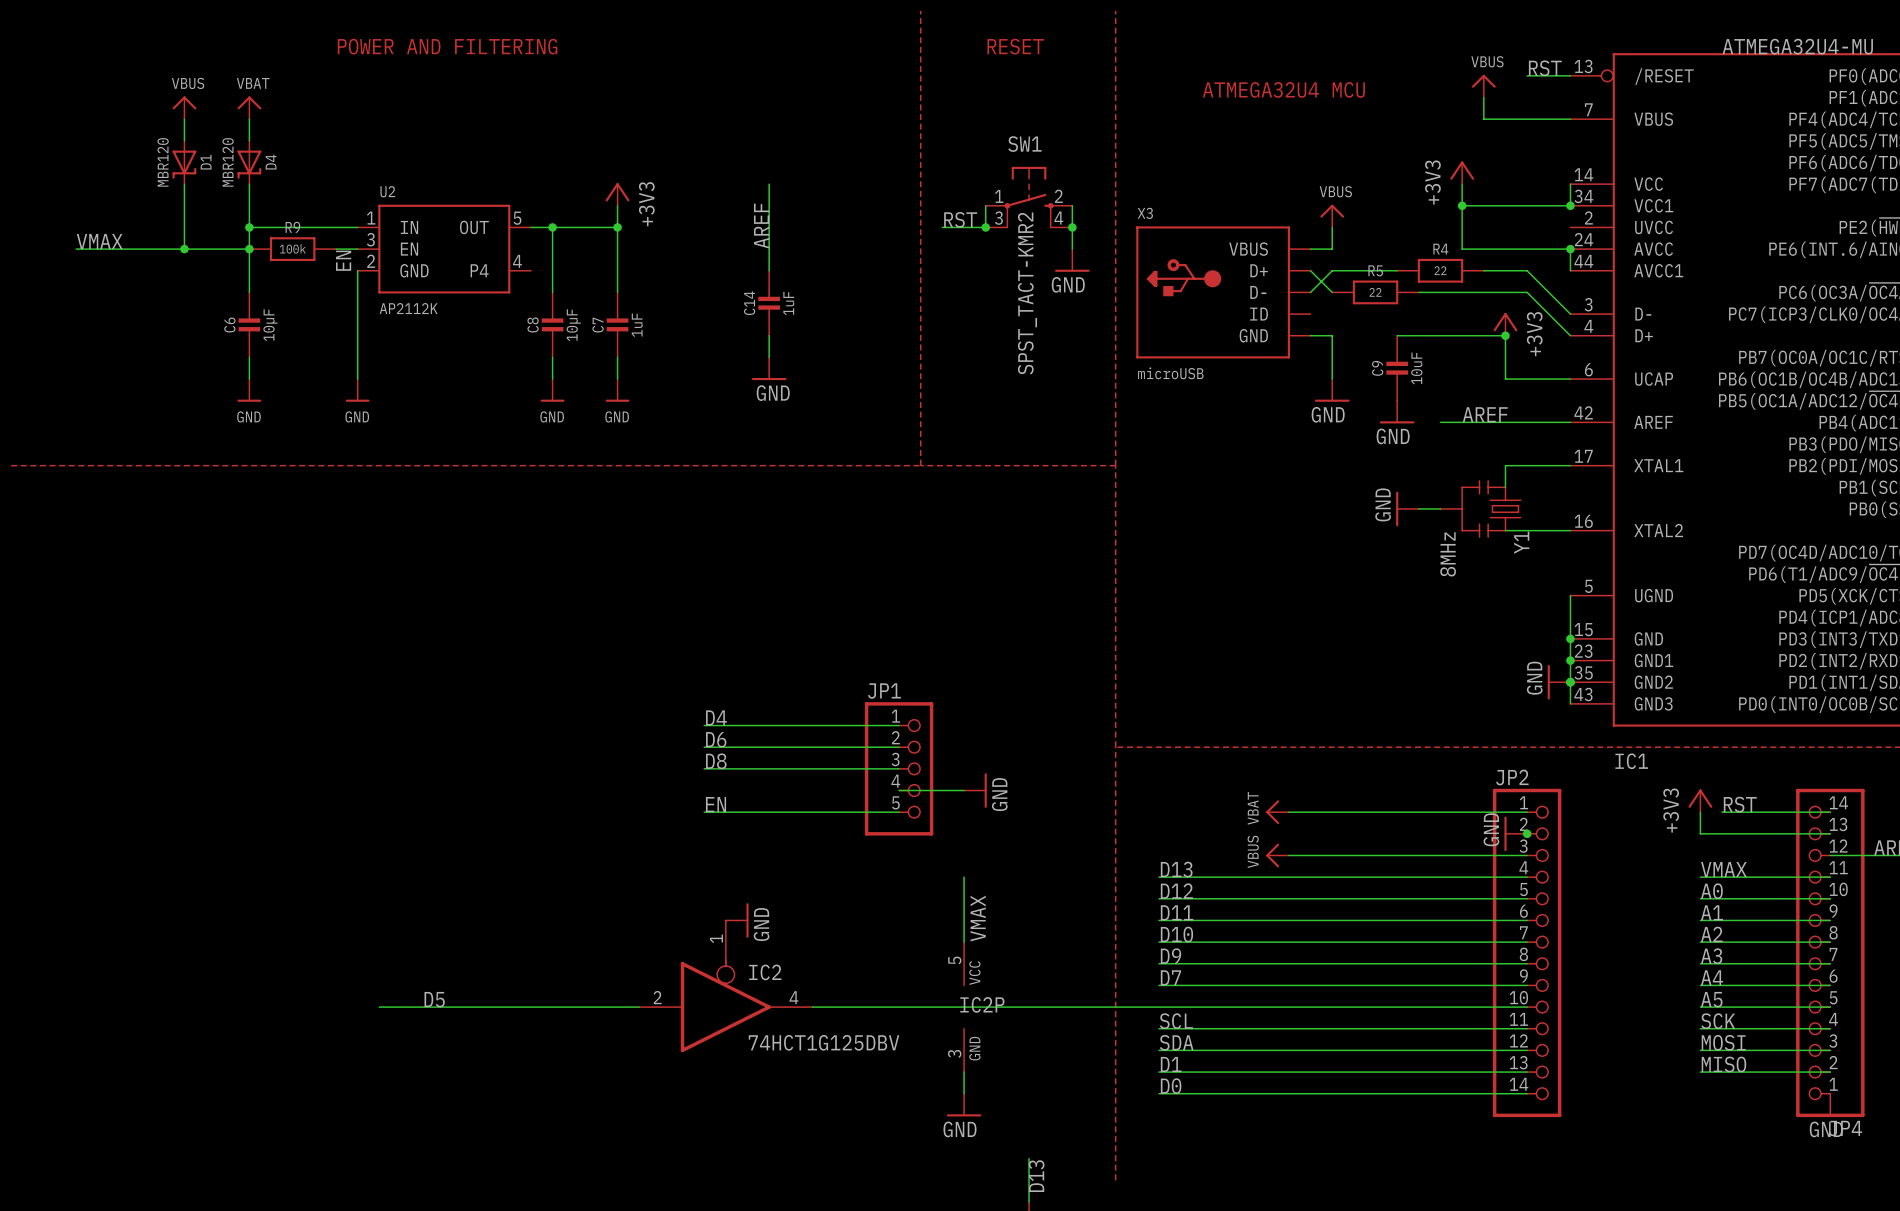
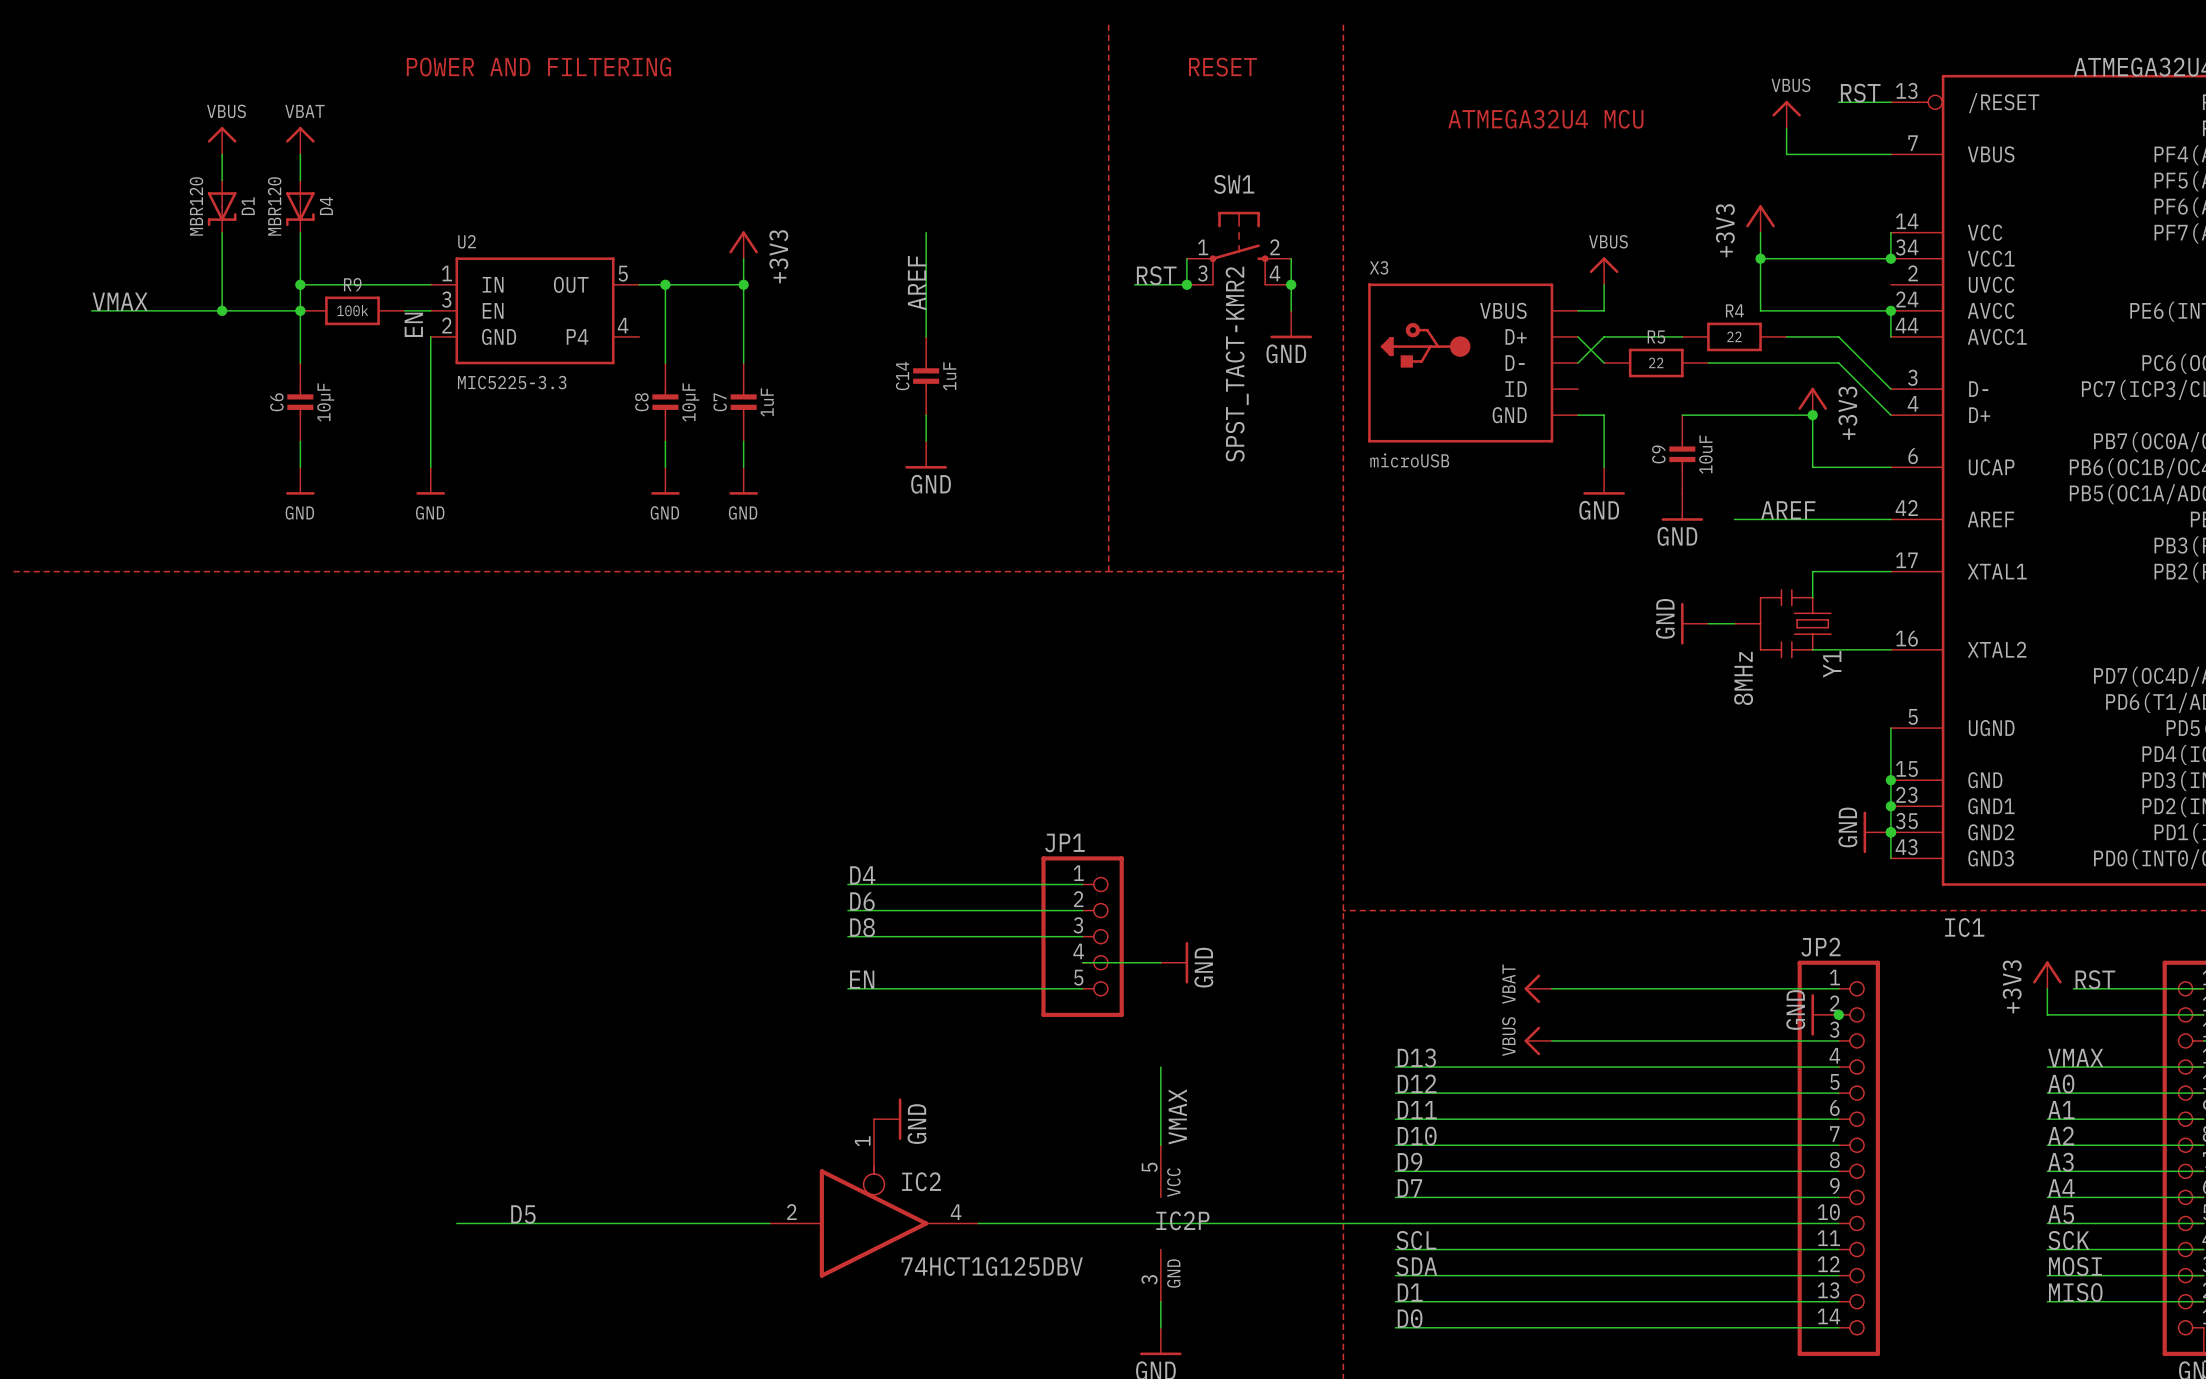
U2 value: AP2112K (408, 308) -> MIC5225-3.3 (512, 382)

